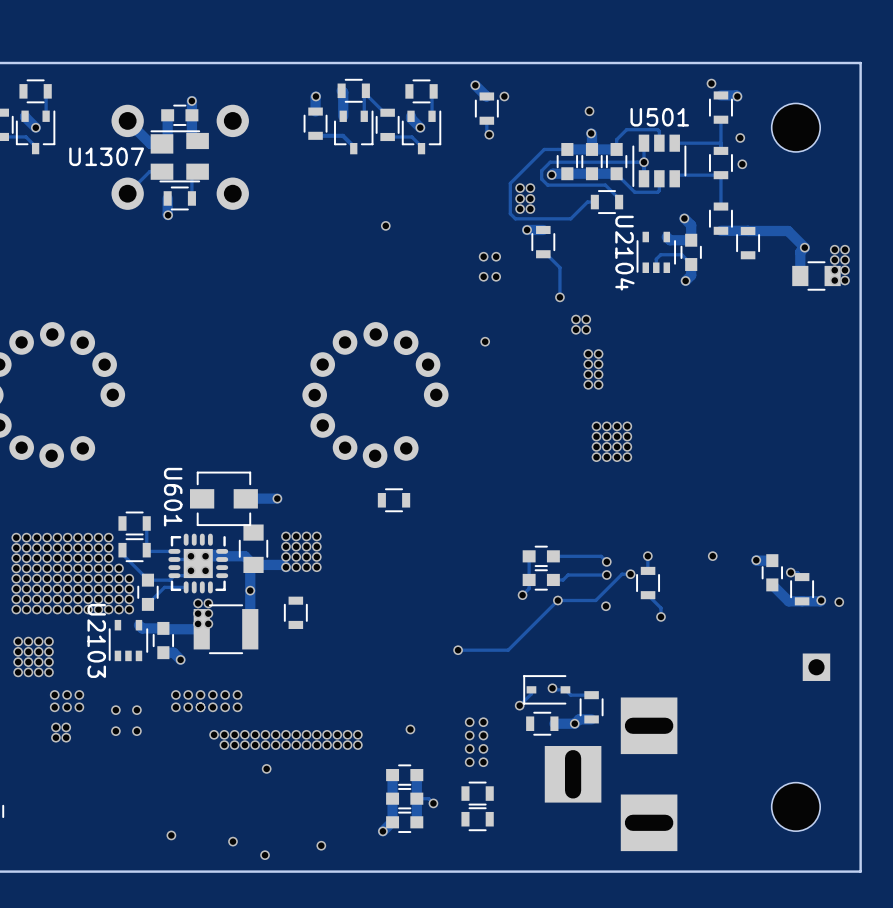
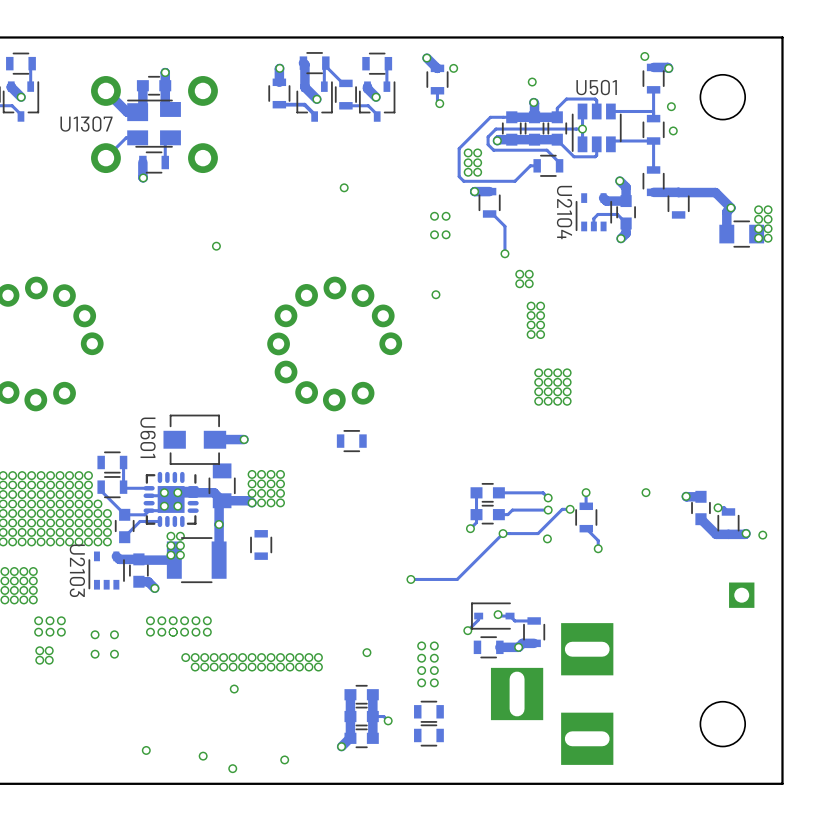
track: none -> (304, 86) (316, 99)
via: none -> (316, 99)
via: none -> (216, 246)

